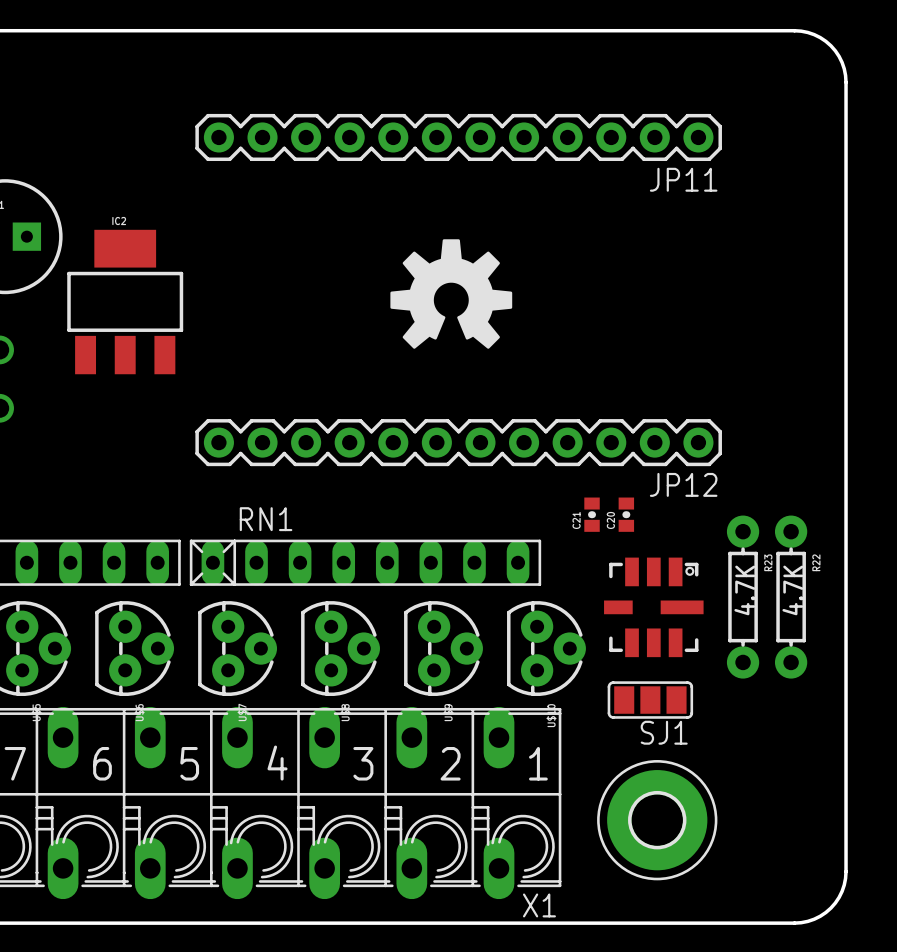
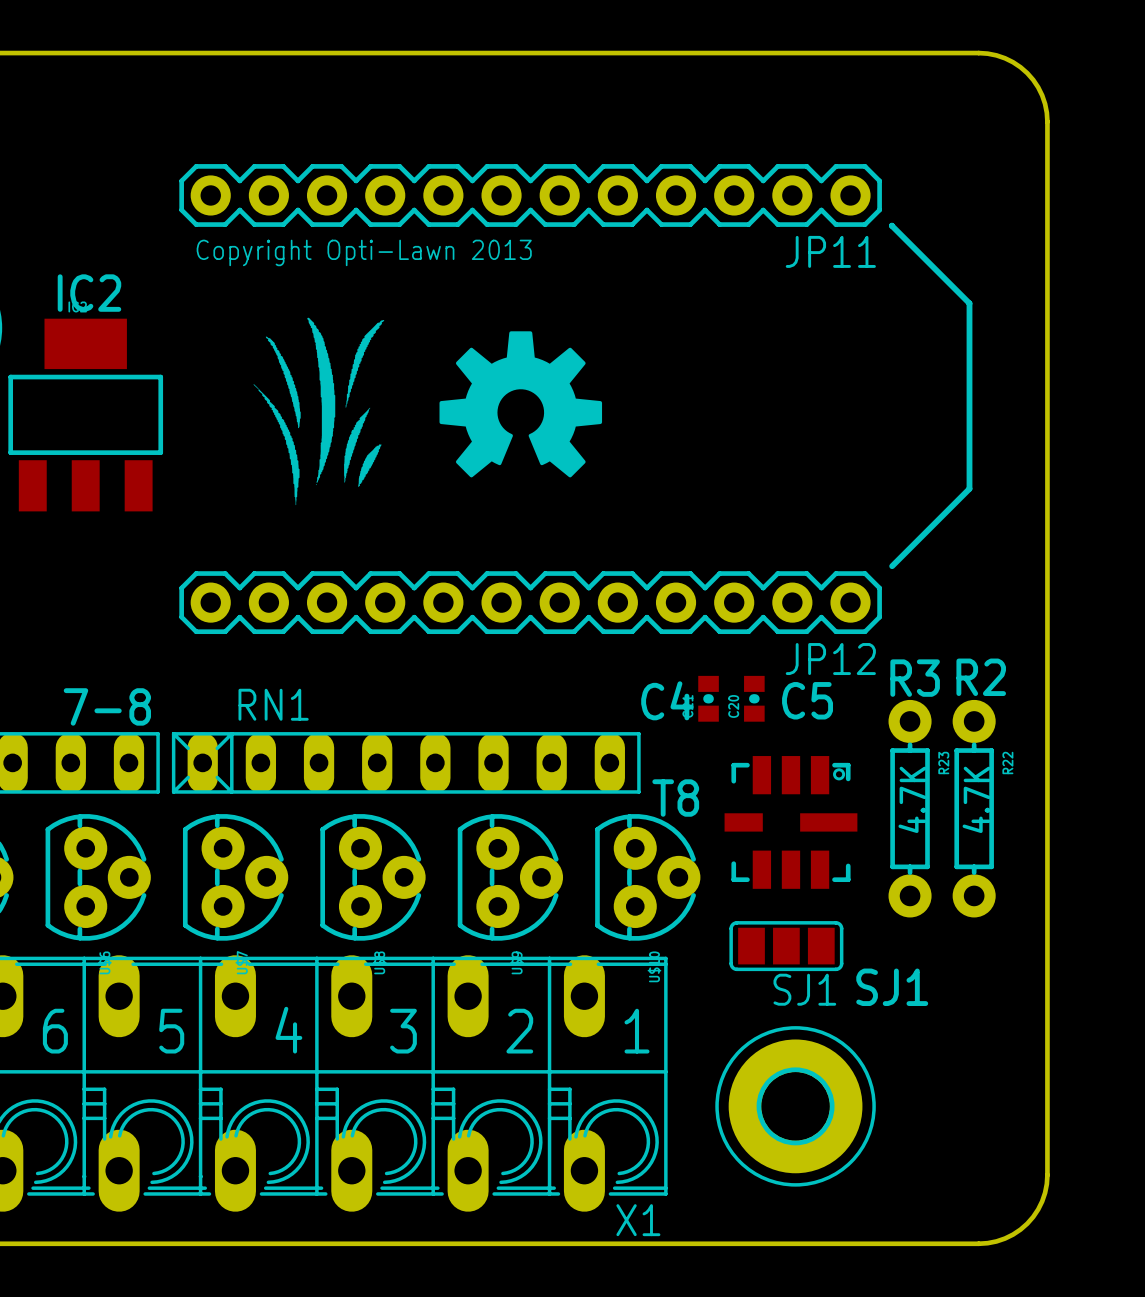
line: none -> (891, 225) (969, 303) (969, 488) (892, 566)
text: none -> Copyright Opti-Lawn 2013 (364, 252)
text: none -> IC2 (89, 293)
drawing: none -> [253, 317, 385, 506]
text: none -> R2 (981, 677)
text: none -> R3 (915, 678)
text: none -> C4 (667, 700)
text: none -> C5 (807, 700)
text: none -> 7-8 (107, 706)
text: none -> T8 (675, 798)
text: none -> SJ1 (892, 987)

